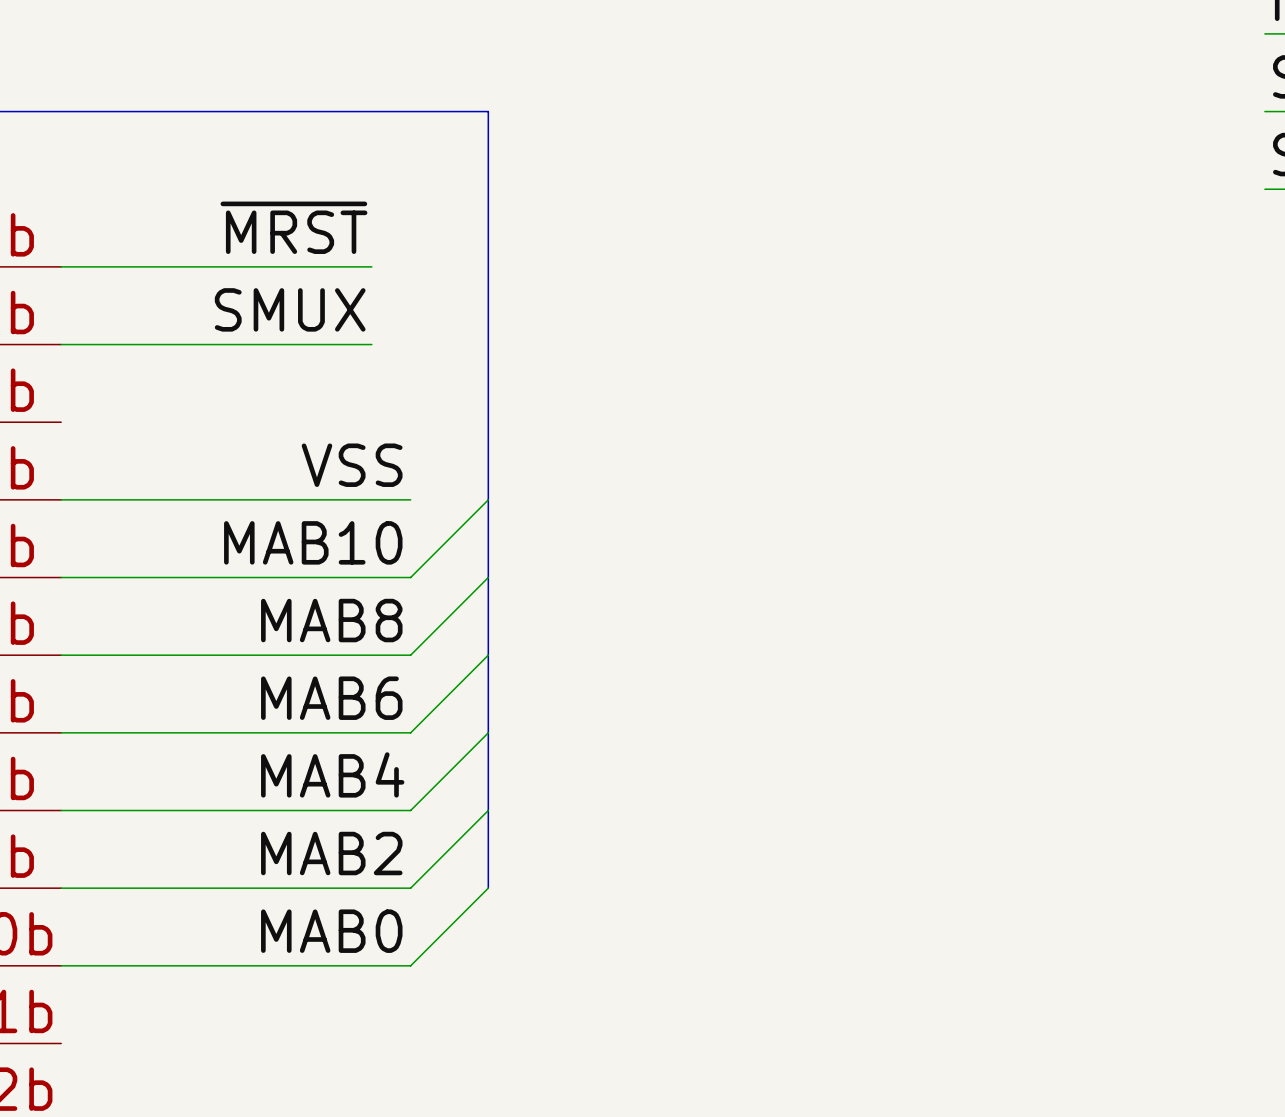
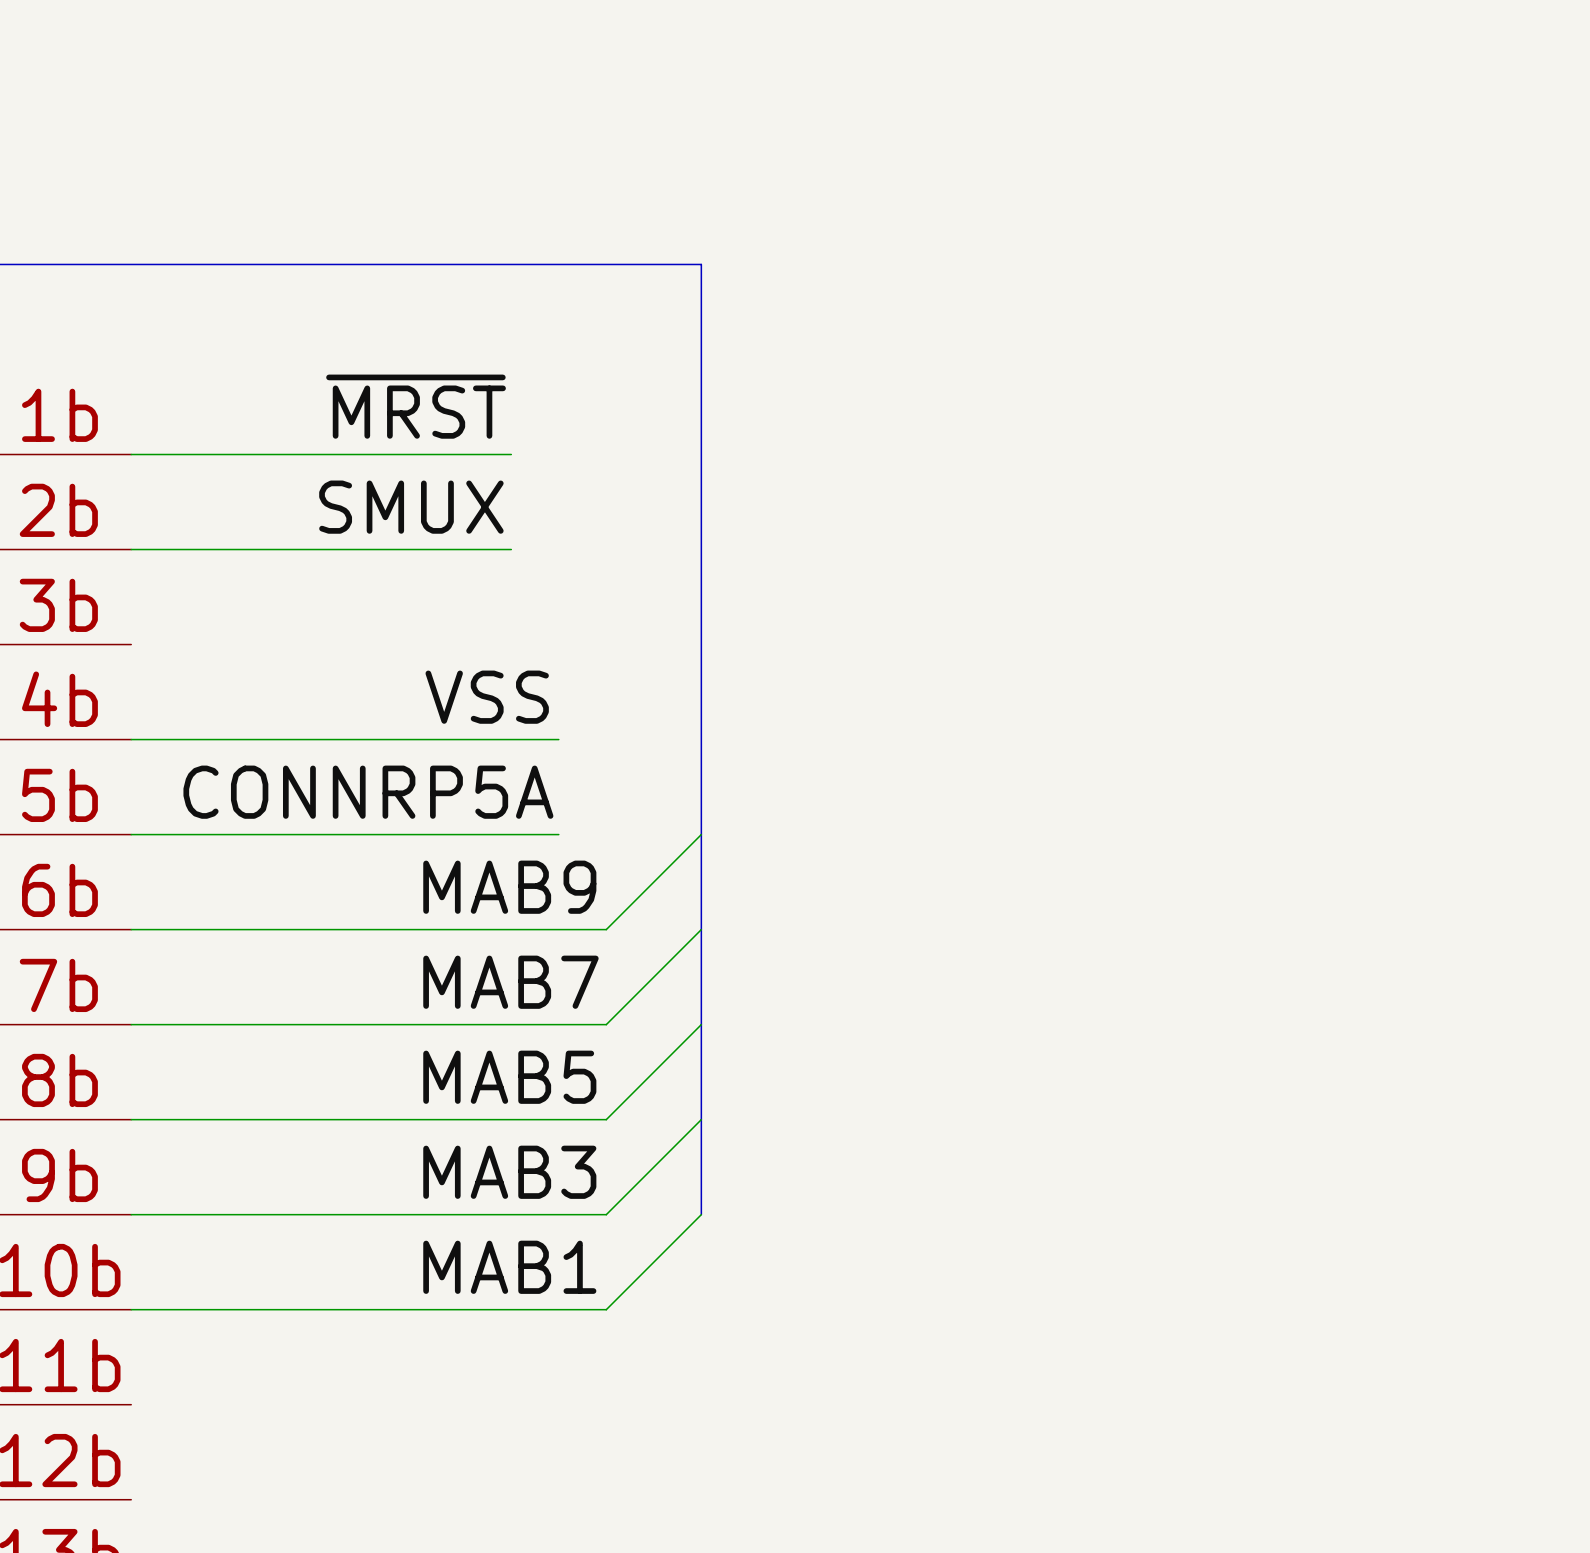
bus: (488, 111) (488, 888) -> (653, 264) (701, 264) (701, 1214)
wire: (488, 499) (410, 577) -> none
label: MAB10 (313, 542) -> CONNRP5A (368, 792)
wire: (488, 577) (410, 655) -> (701, 834) (606, 929) (558, 929)
label: MAB8 (331, 620) -> MAB9 (509, 887)
wire: (488, 655) (410, 732) -> (701, 929) (606, 1024) (558, 1024)
label: MAB6 (331, 698) -> MAB7 (510, 982)
wire: (488, 732) (410, 810) -> (701, 1024) (606, 1119) (558, 1119)
label: MAB4 (332, 774) -> MAB5 (509, 1077)
wire: (488, 810) (410, 888) -> (701, 1119) (606, 1214) (558, 1214)
label: MAB2 (331, 853) -> MAB3 (509, 1172)
wire: (488, 888) (410, 965) -> (701, 1214) (606, 1309) (558, 1309)
label: MAB0 (331, 931) -> MAB1 (509, 1267)

